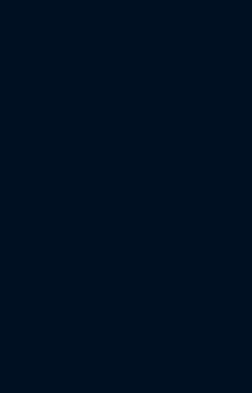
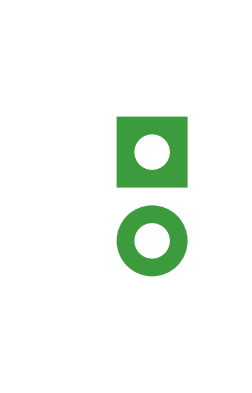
part: none -> (152, 196)

